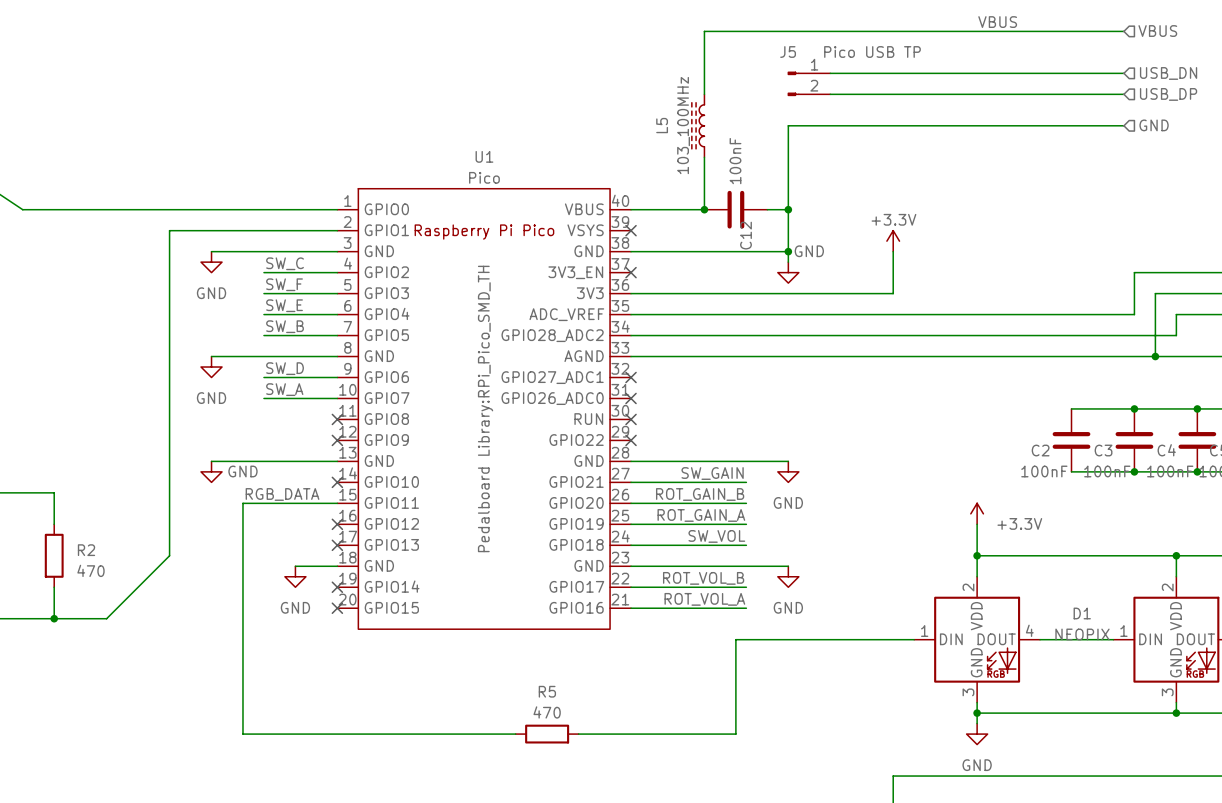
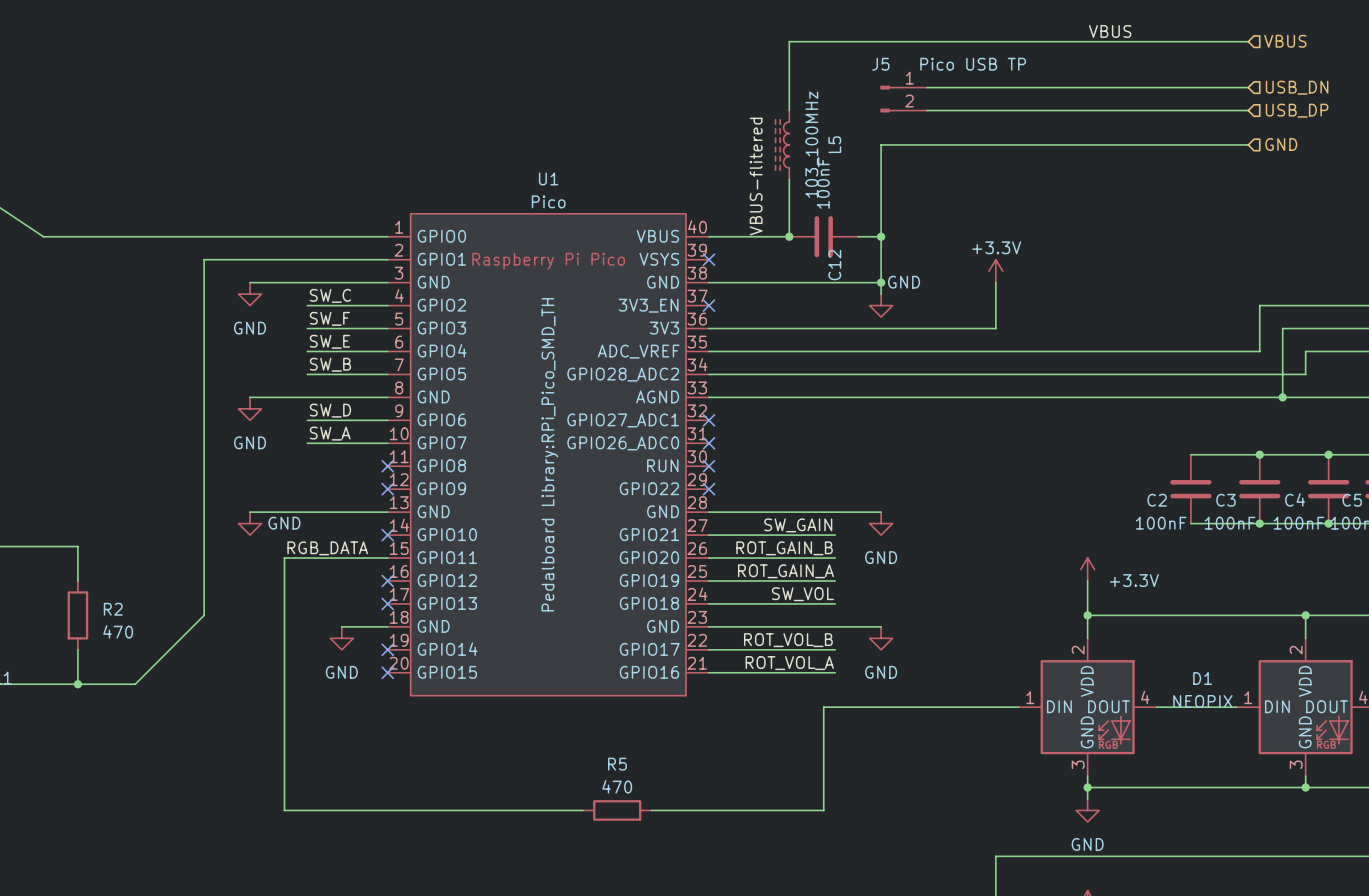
L5 name position: L5 (662, 125) -> L5 (834, 144)
L5 value position: 103_100MHz (683, 125) -> 103_100MHz (812, 144)
label: none -> VBUS-flitered (756, 176)

